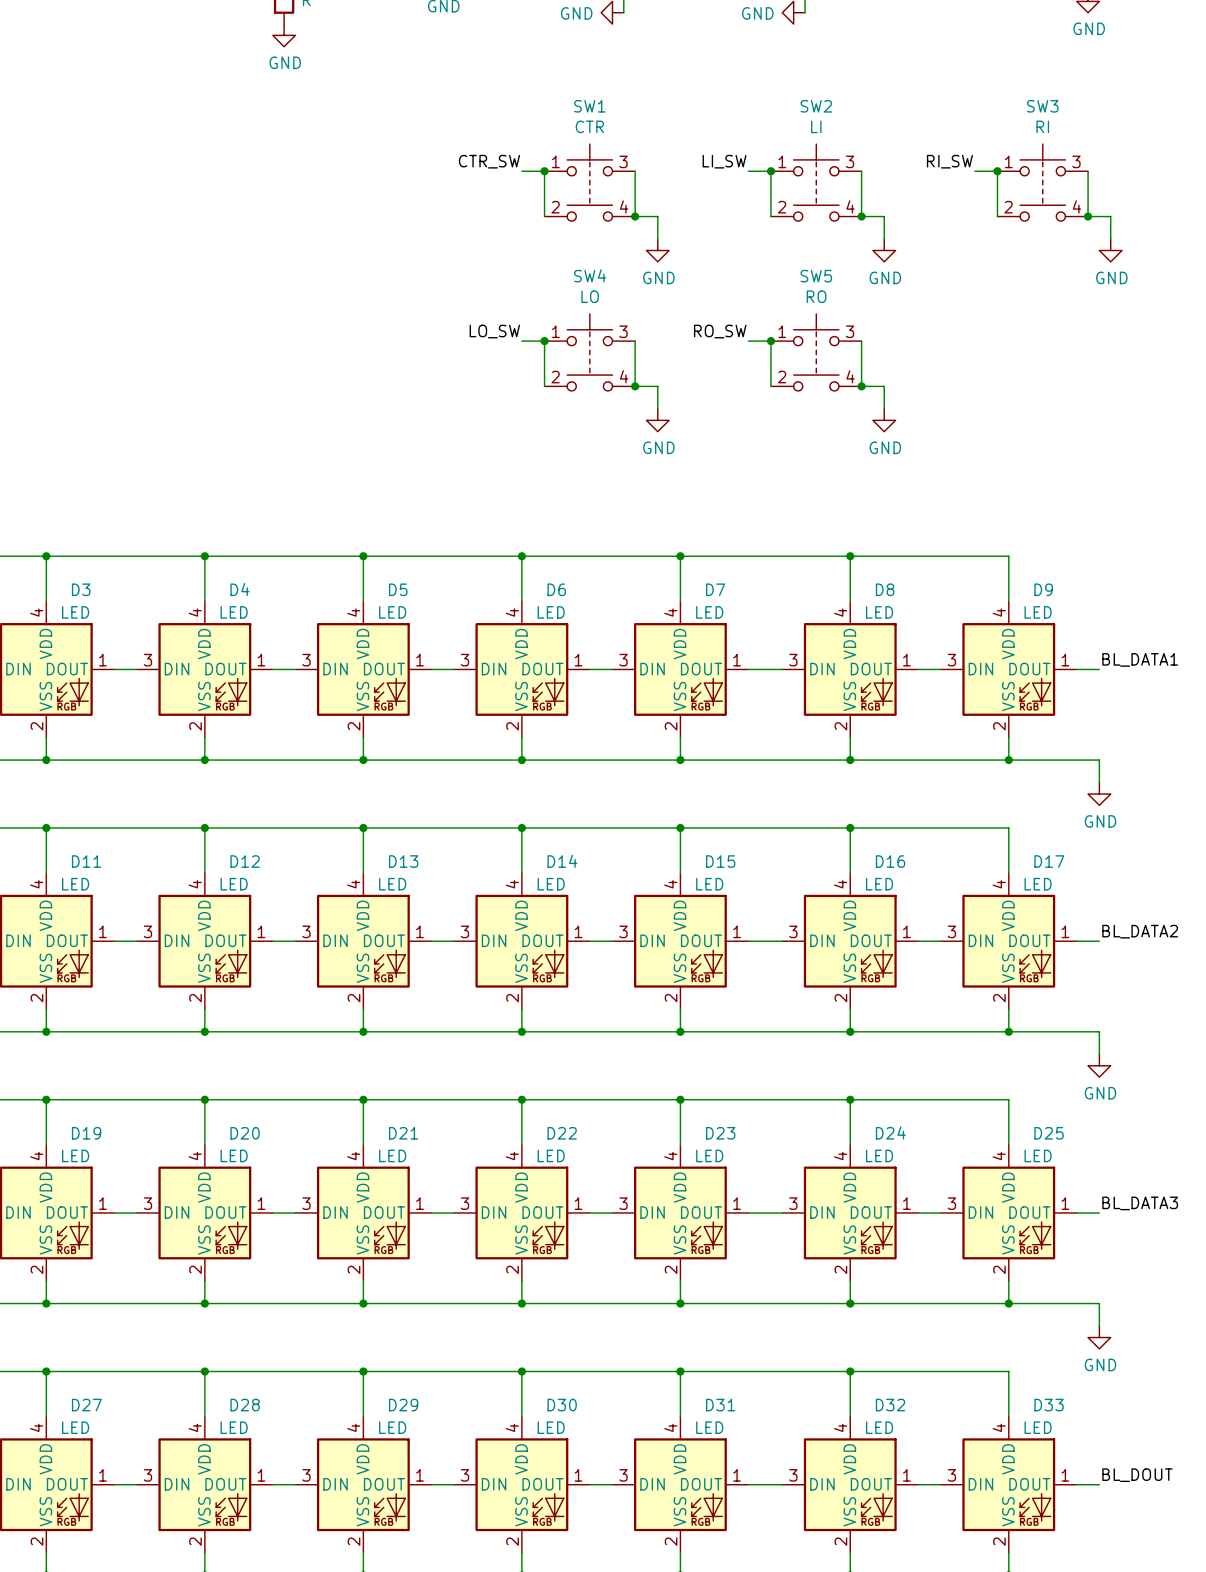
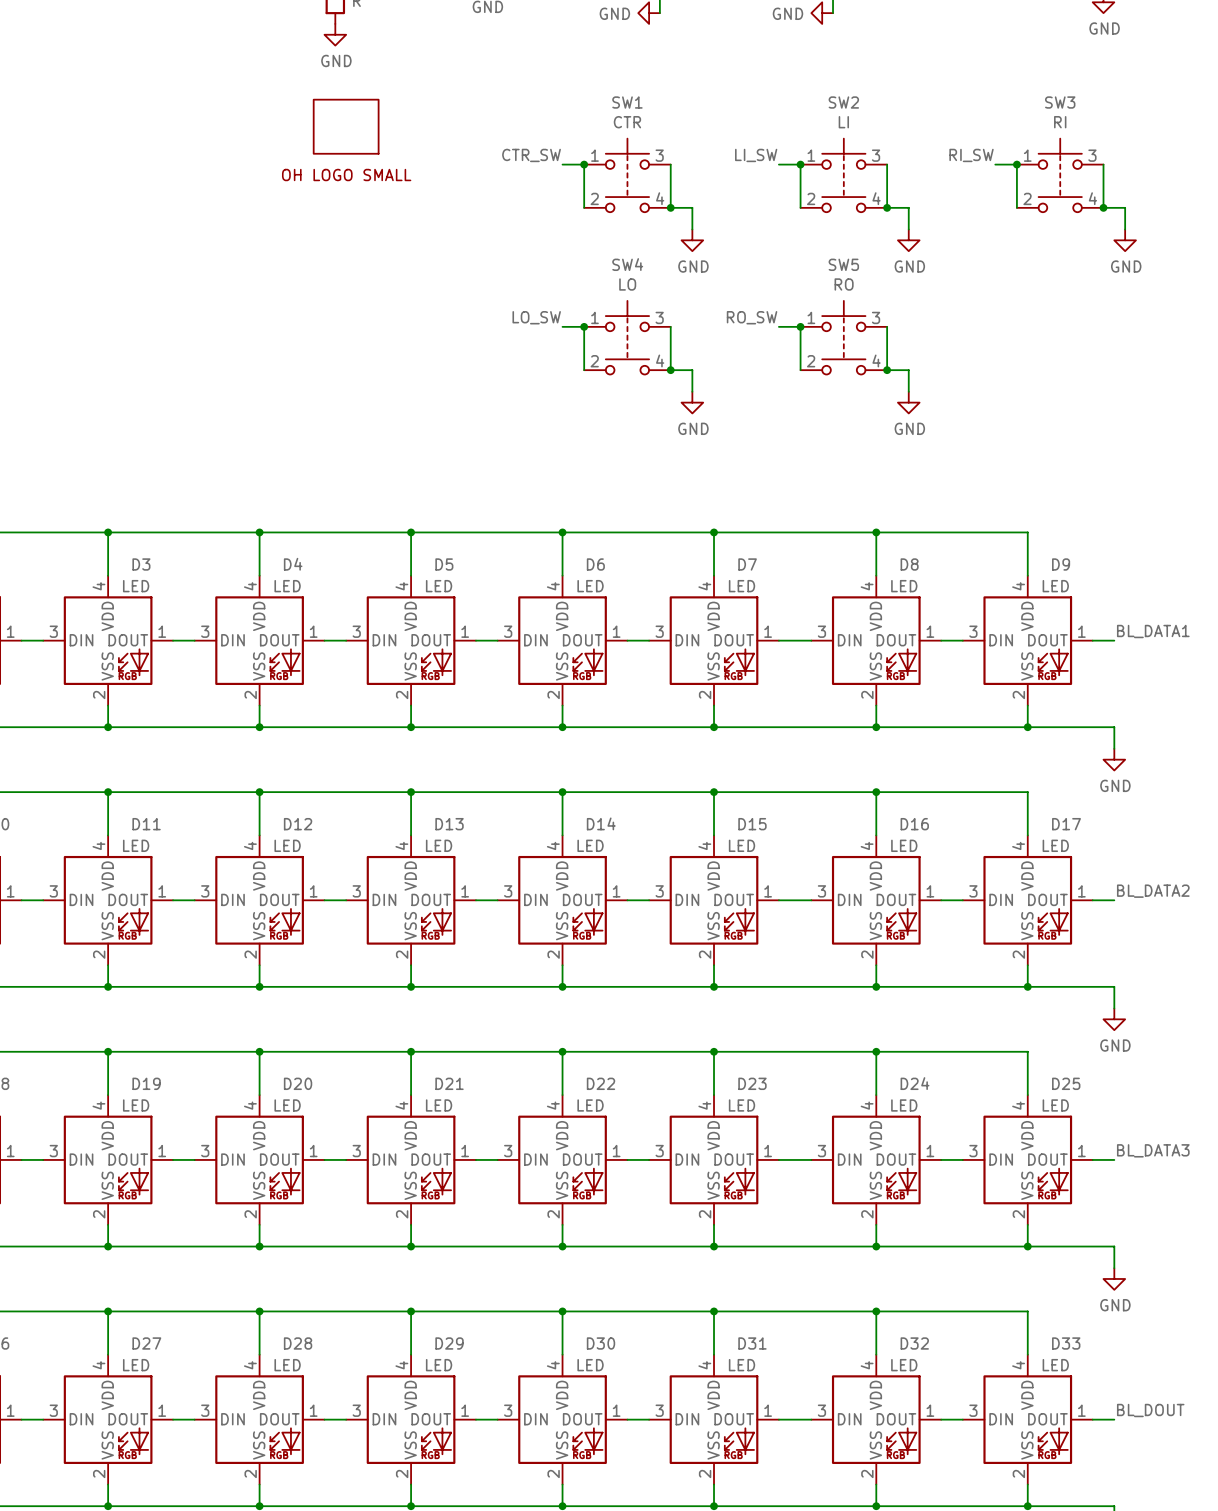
part: none -> (346, 126)

